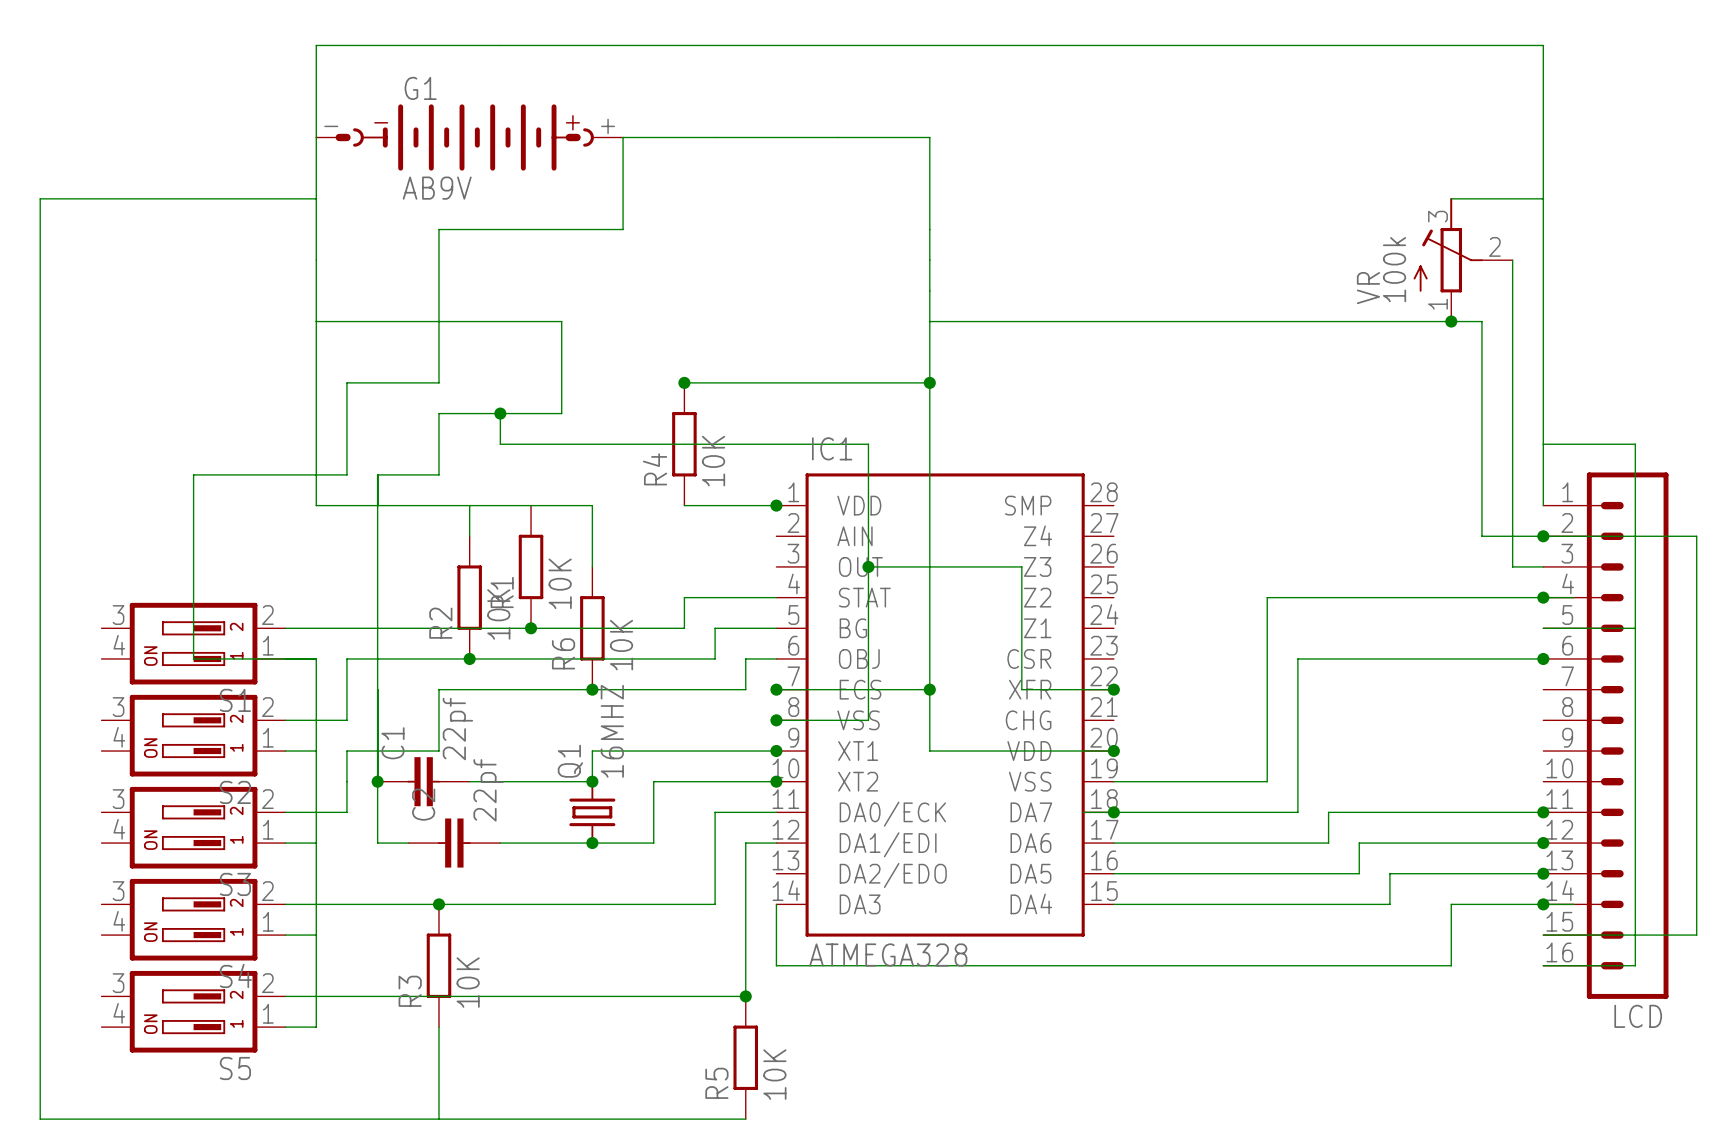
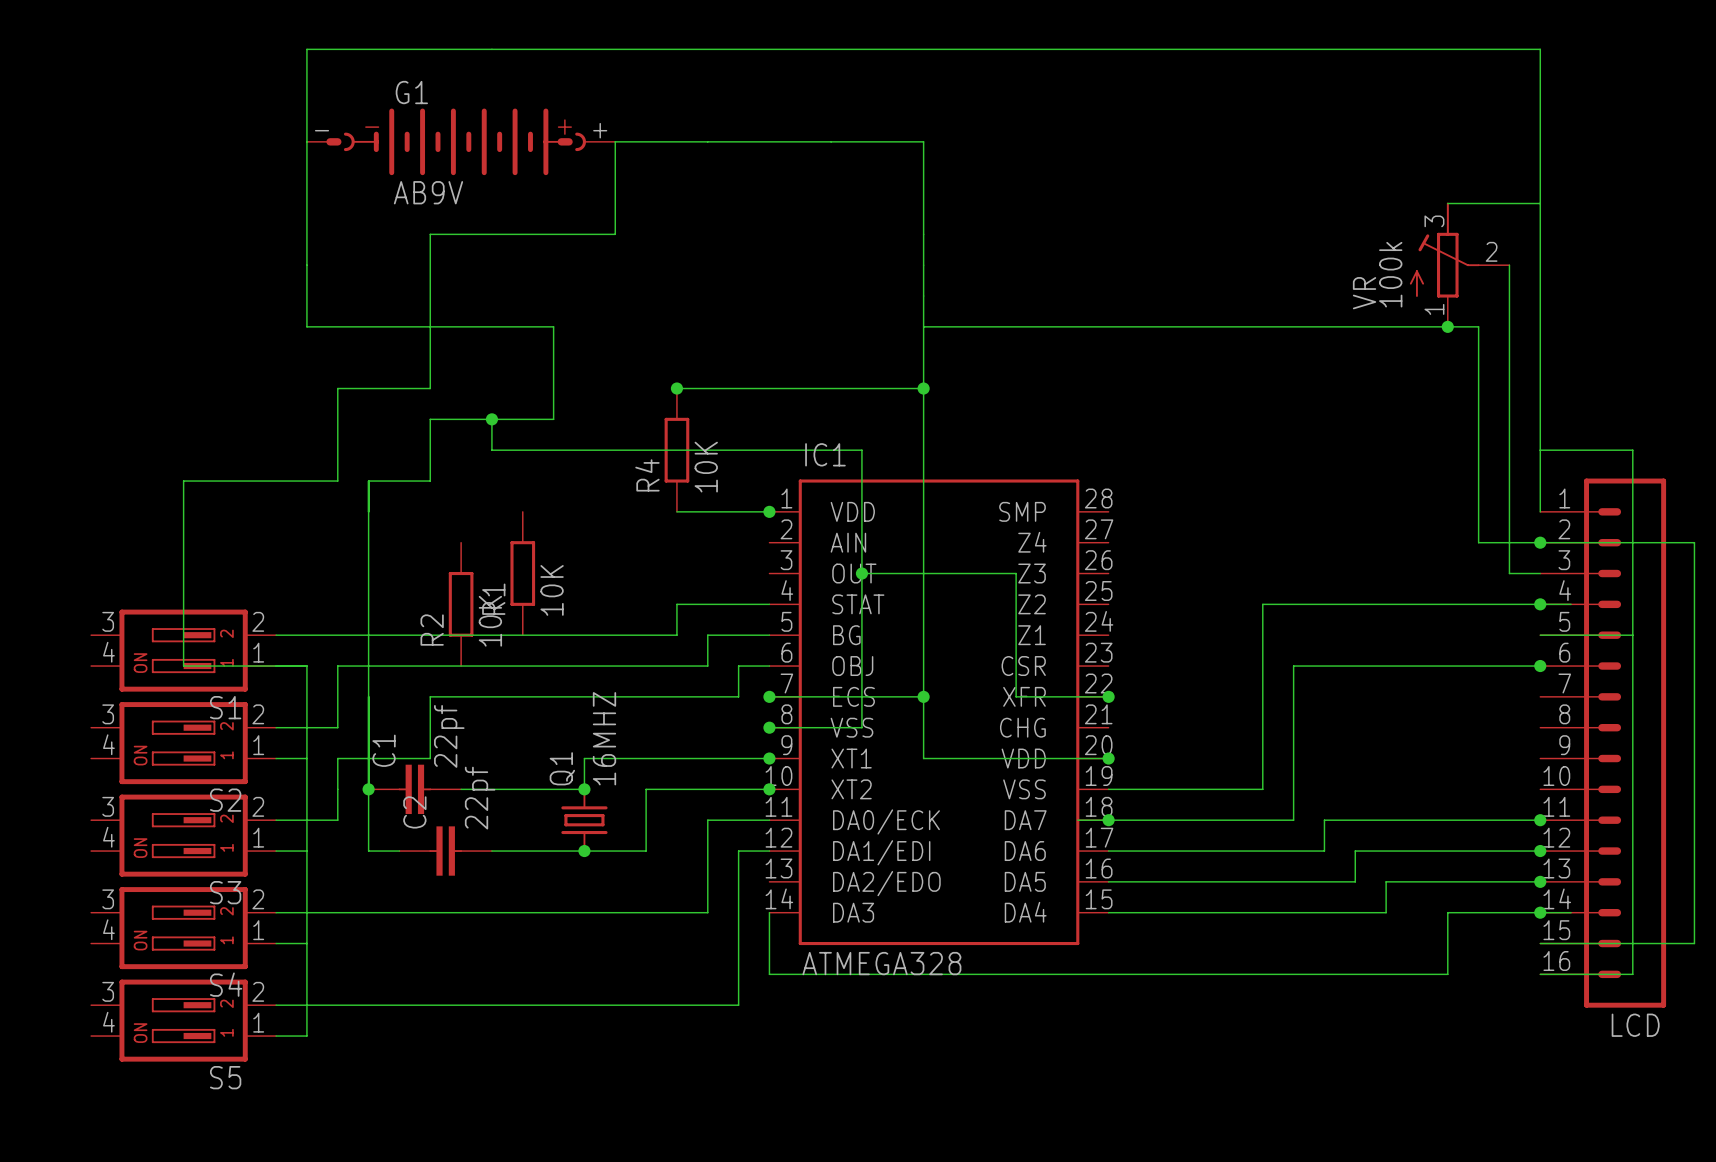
wire: (316, 198) (40, 198) (40, 1119) (745, 1119) -> none
wire: (316, 321) (316, 505) (592, 505) (592, 566) -> none
wire: (469, 505) (469, 536) -> none
junction: (531, 628) -> none
R6: 10K (592, 628) -> none
junction: (469, 658) -> none
junction: (592, 689) -> none
junction: (438, 904) -> none
R3: 10K (438, 965) -> none
junction: (745, 996) -> none
wire: (438, 1027) (438, 1119) -> none
R5: 10K (745, 1057) -> none

